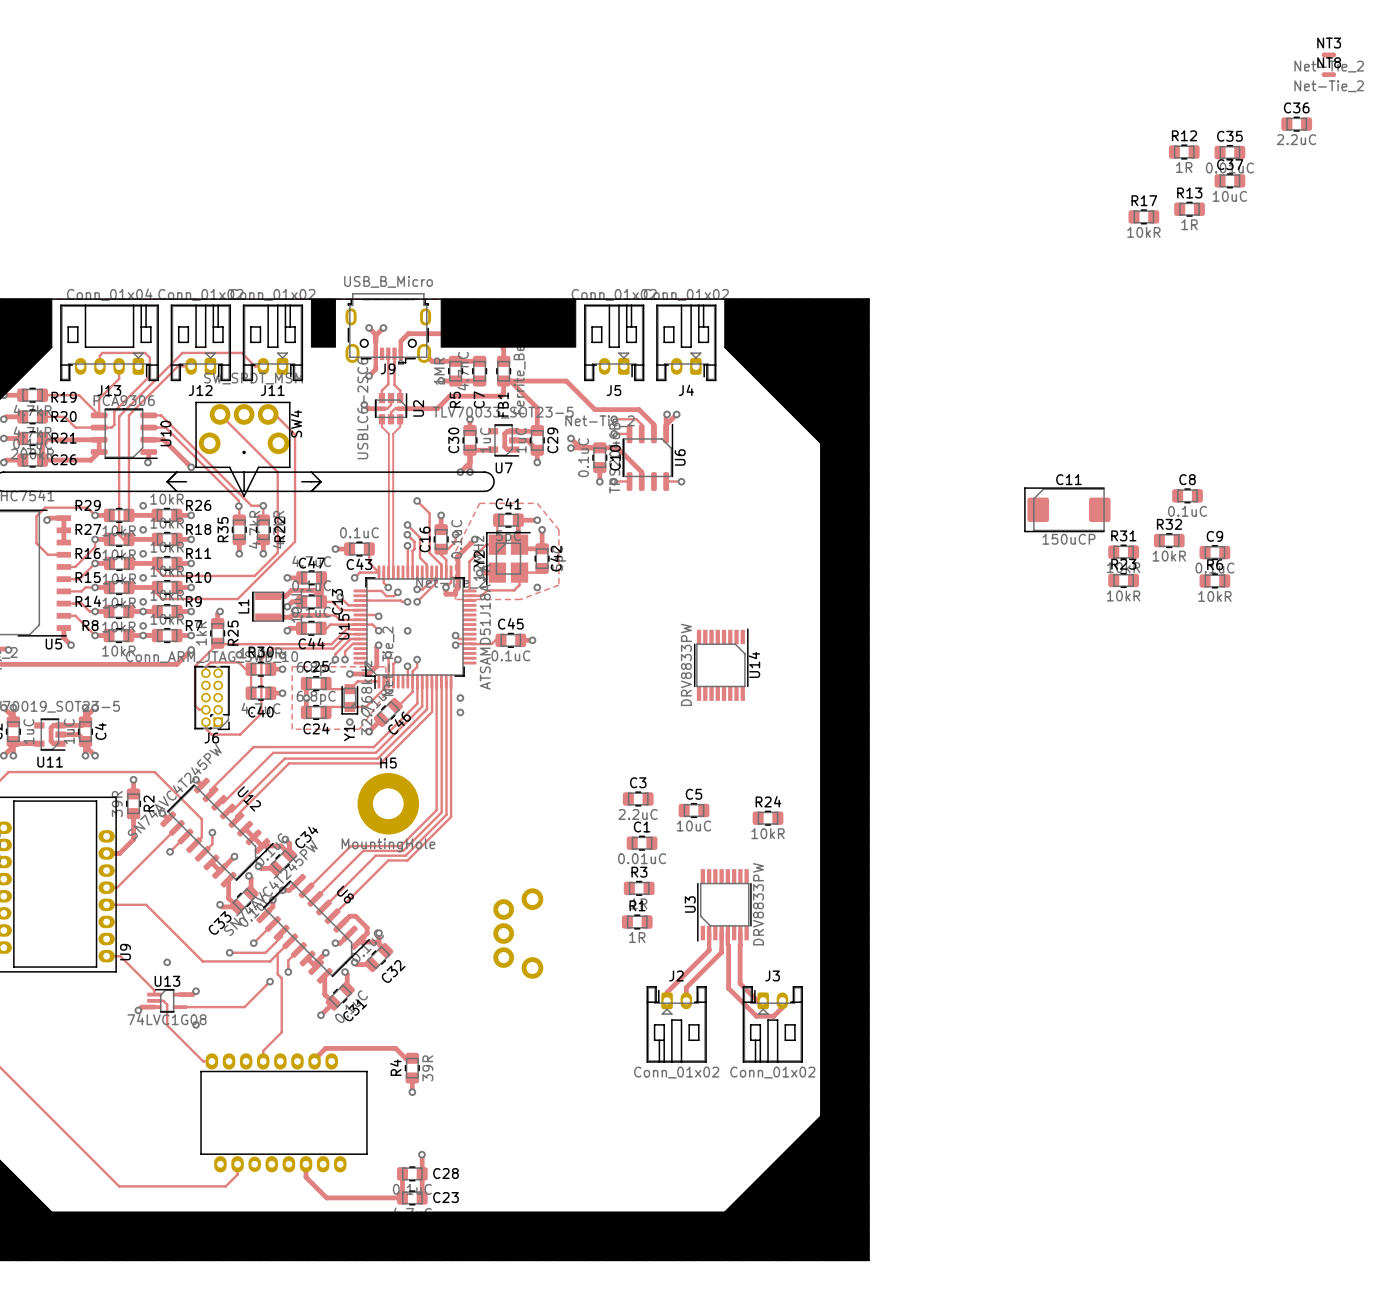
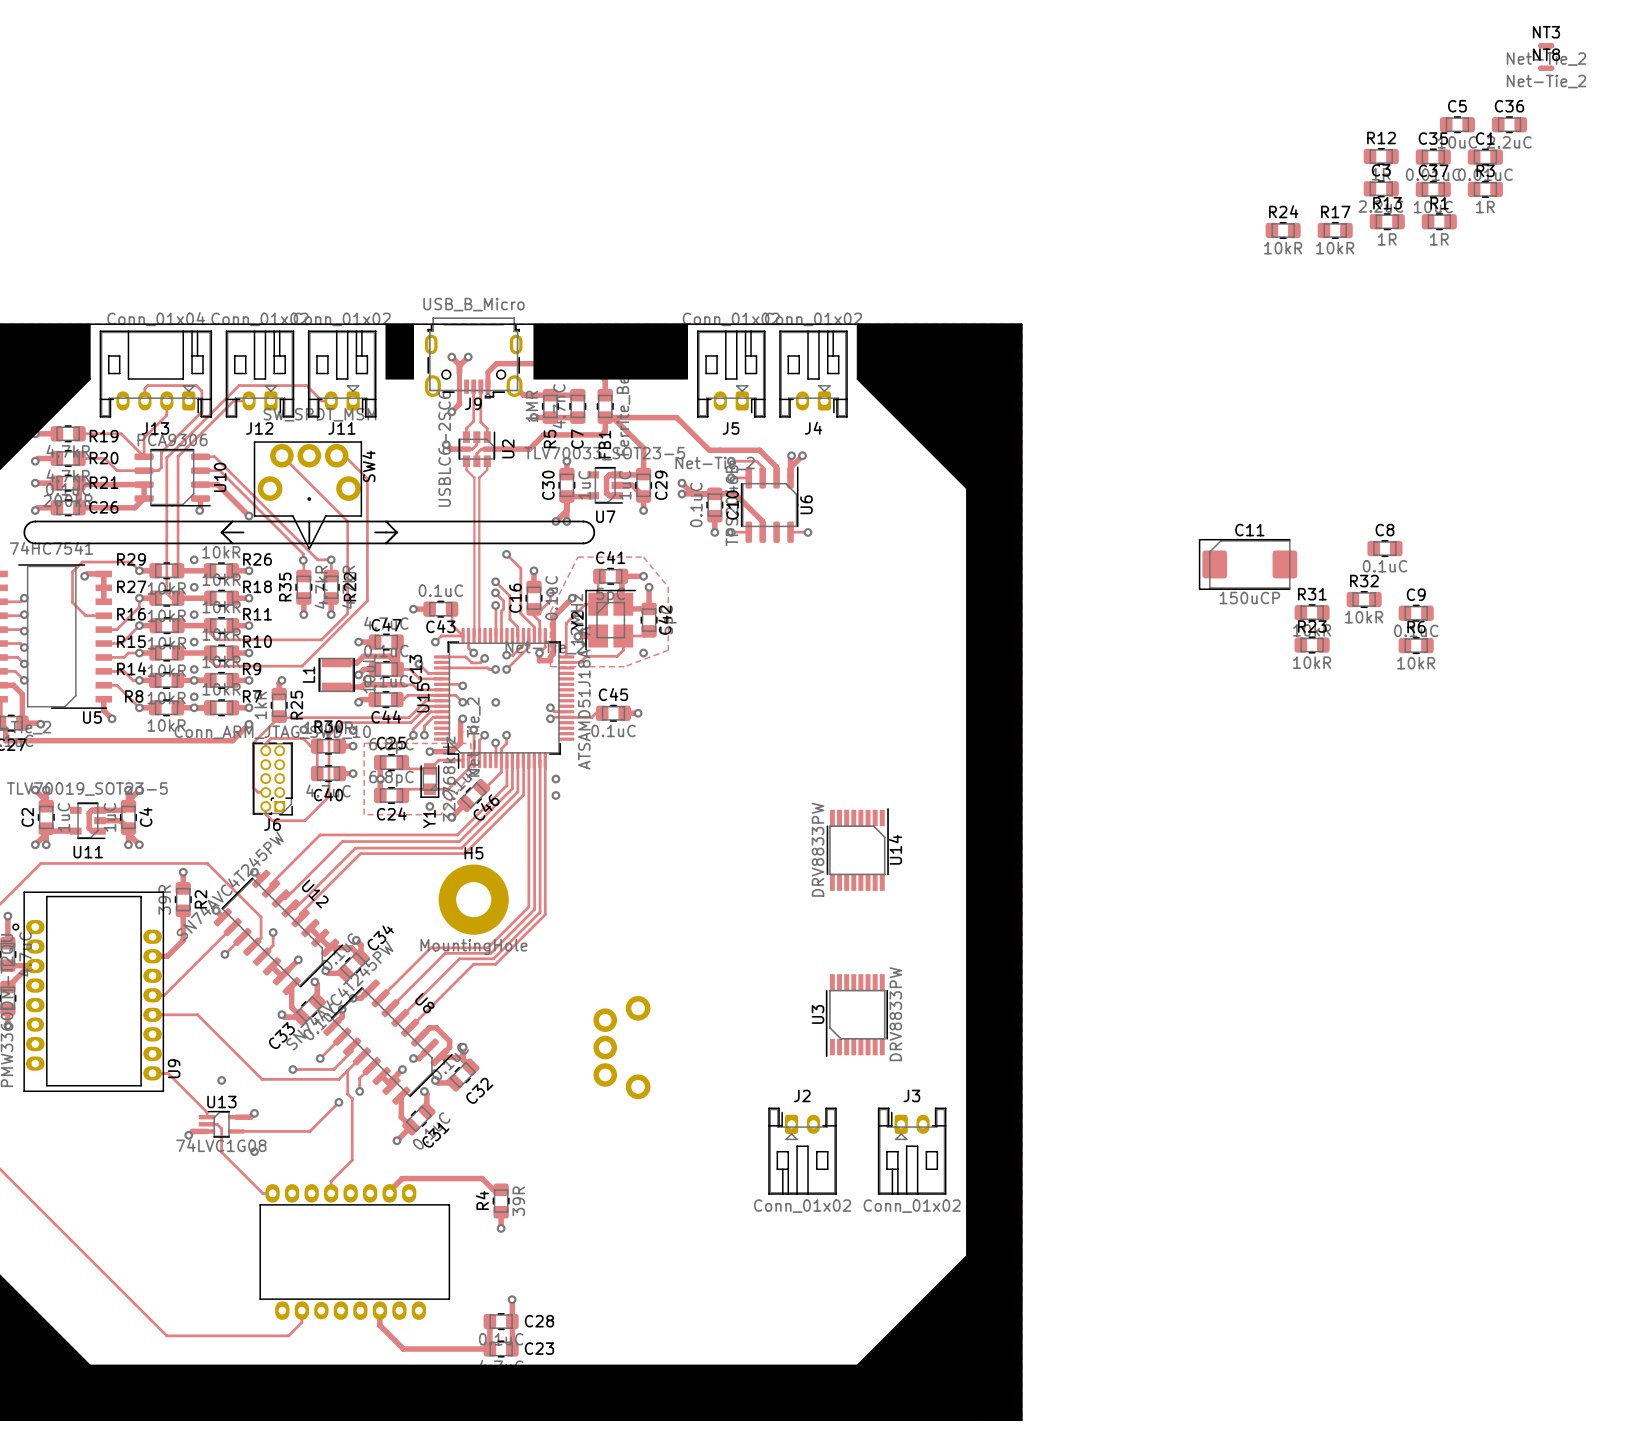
U14 position: (721, 664) -> (857, 849)
C3 position: (638, 798) -> (1381, 188)
C5 position: (693, 810) -> (1457, 124)
R24 position: (768, 818) -> (1283, 230)
C1 position: (642, 843) -> (1485, 157)
R3 position: (639, 888) -> (1485, 189)
R1 position: (637, 922) -> (1439, 221)
track: (709, 933) (709, 950) (667, 992) (667, 1000) -> none
track: (721, 933) (721, 952) (686, 987) (686, 1000) -> none
track: (727, 933) (728, 988) (756, 1016) (773, 1016) (782, 1007) (782, 1000) -> none
track: (740, 933) (740, 983) (757, 1000) (763, 1000) -> none

